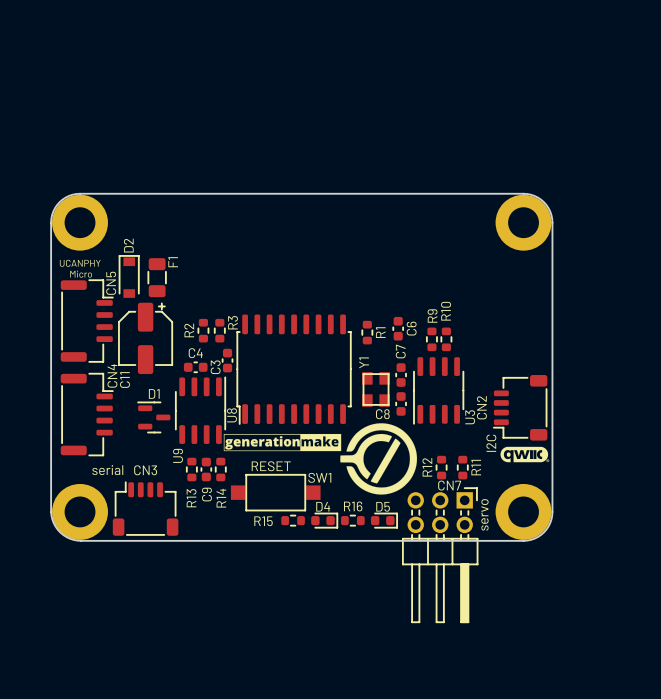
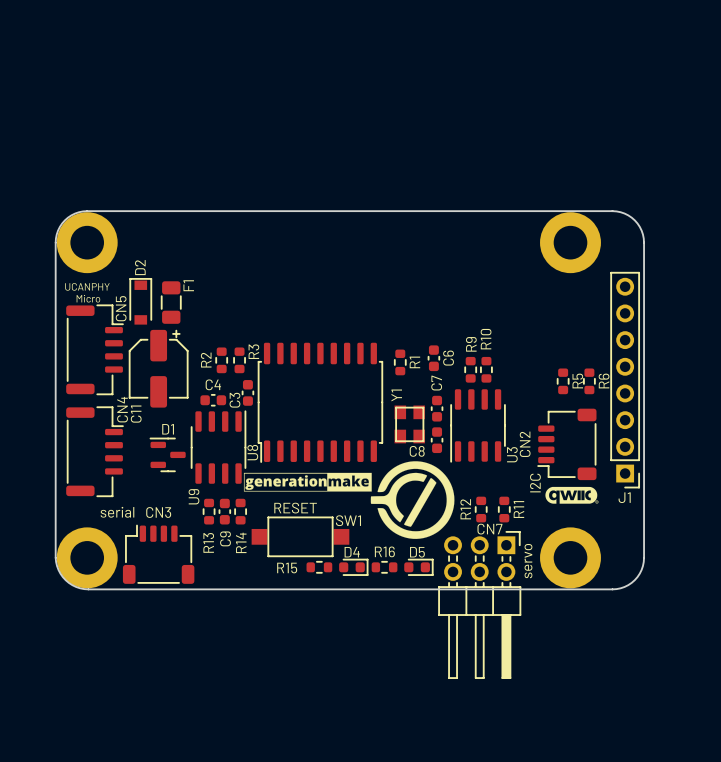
board edge: (523, 193) (534, 195) (543, 202) (550, 211) (552, 222) (552, 515) (548, 526) (541, 534) (523, 540) -> (570, 211) (612, 211) (624, 213) (637, 223) (641, 230) (644, 242) (642, 566) (634, 580) (620, 588) (570, 589)
J1: none -> (625, 380)
R5: none -> (563, 381)
R6: none -> (589, 381)

